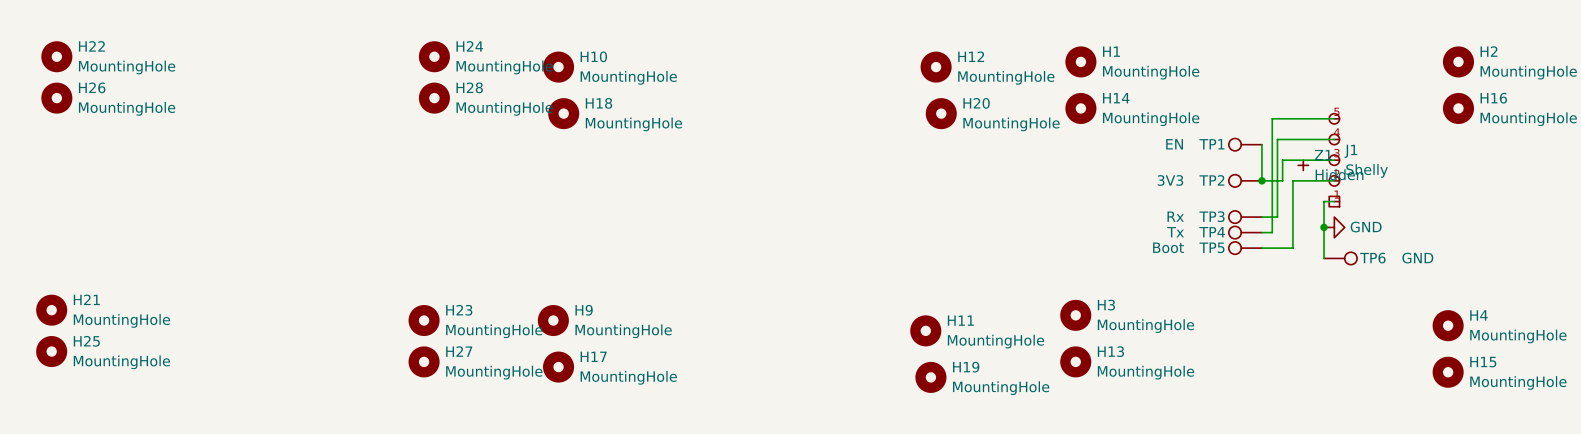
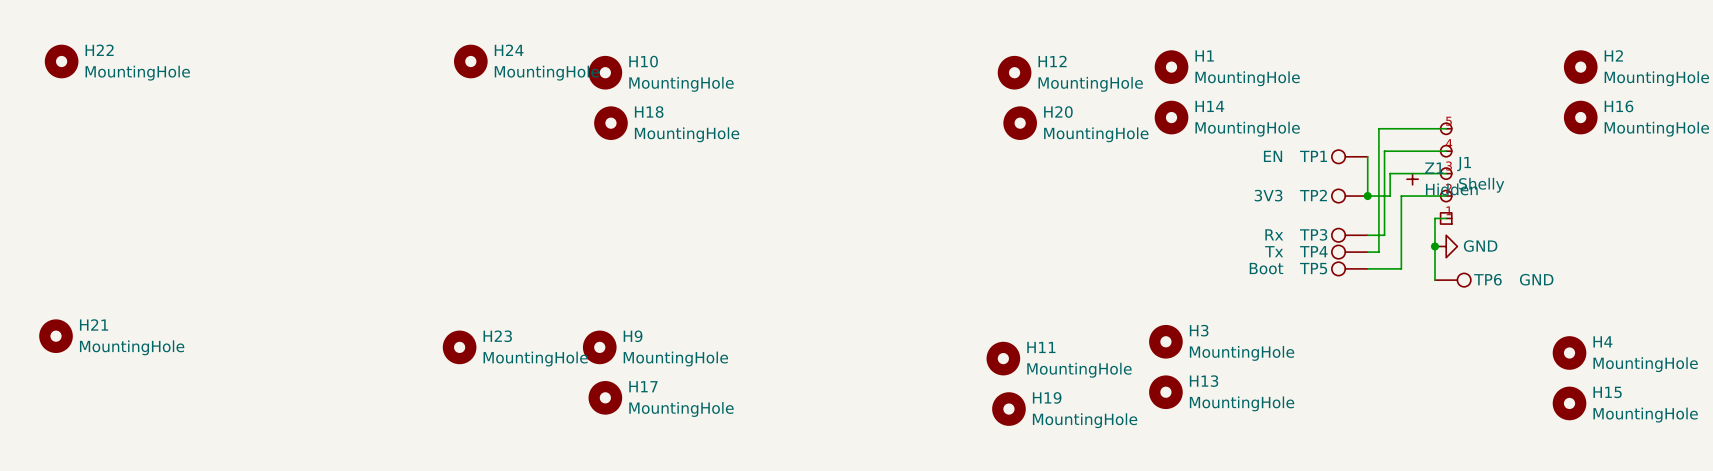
H26: MountingHole (56, 98) -> none
H28: MountingHole (434, 98) -> none
H25: MountingHole (51, 351) -> none
H27: MountingHole (424, 361) -> none

